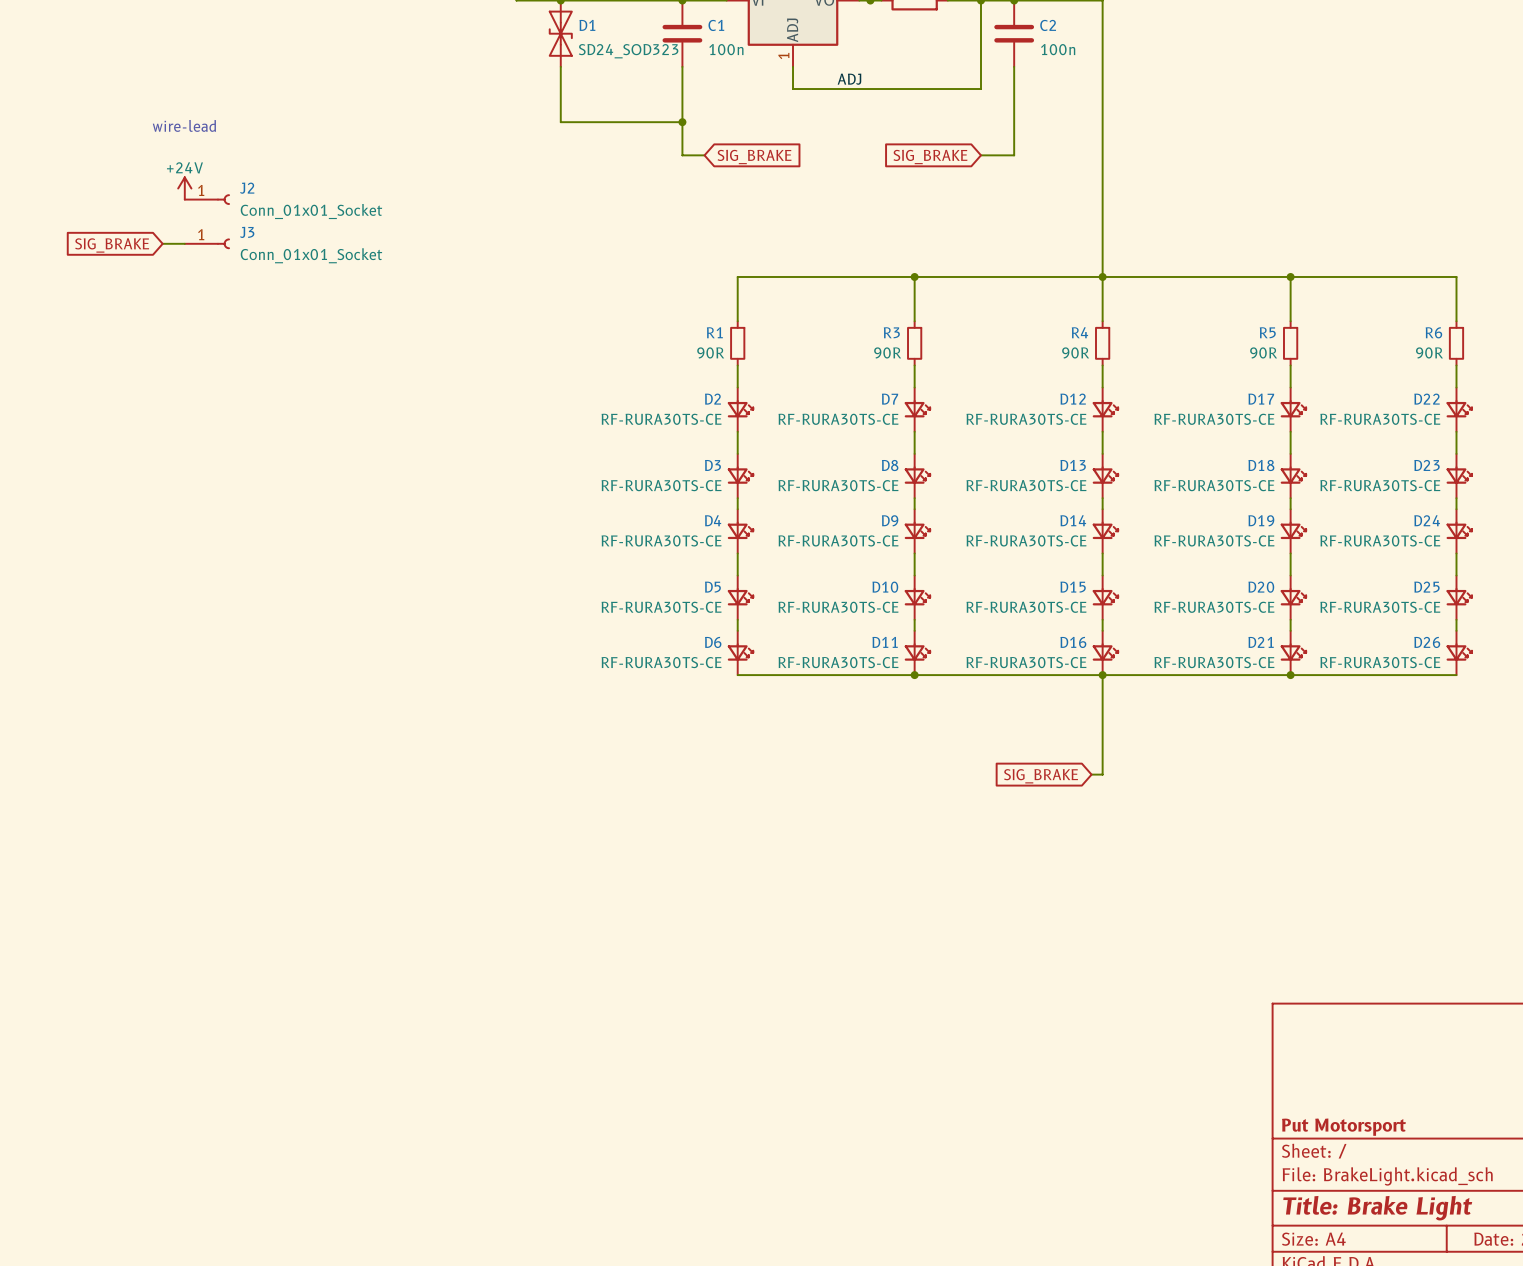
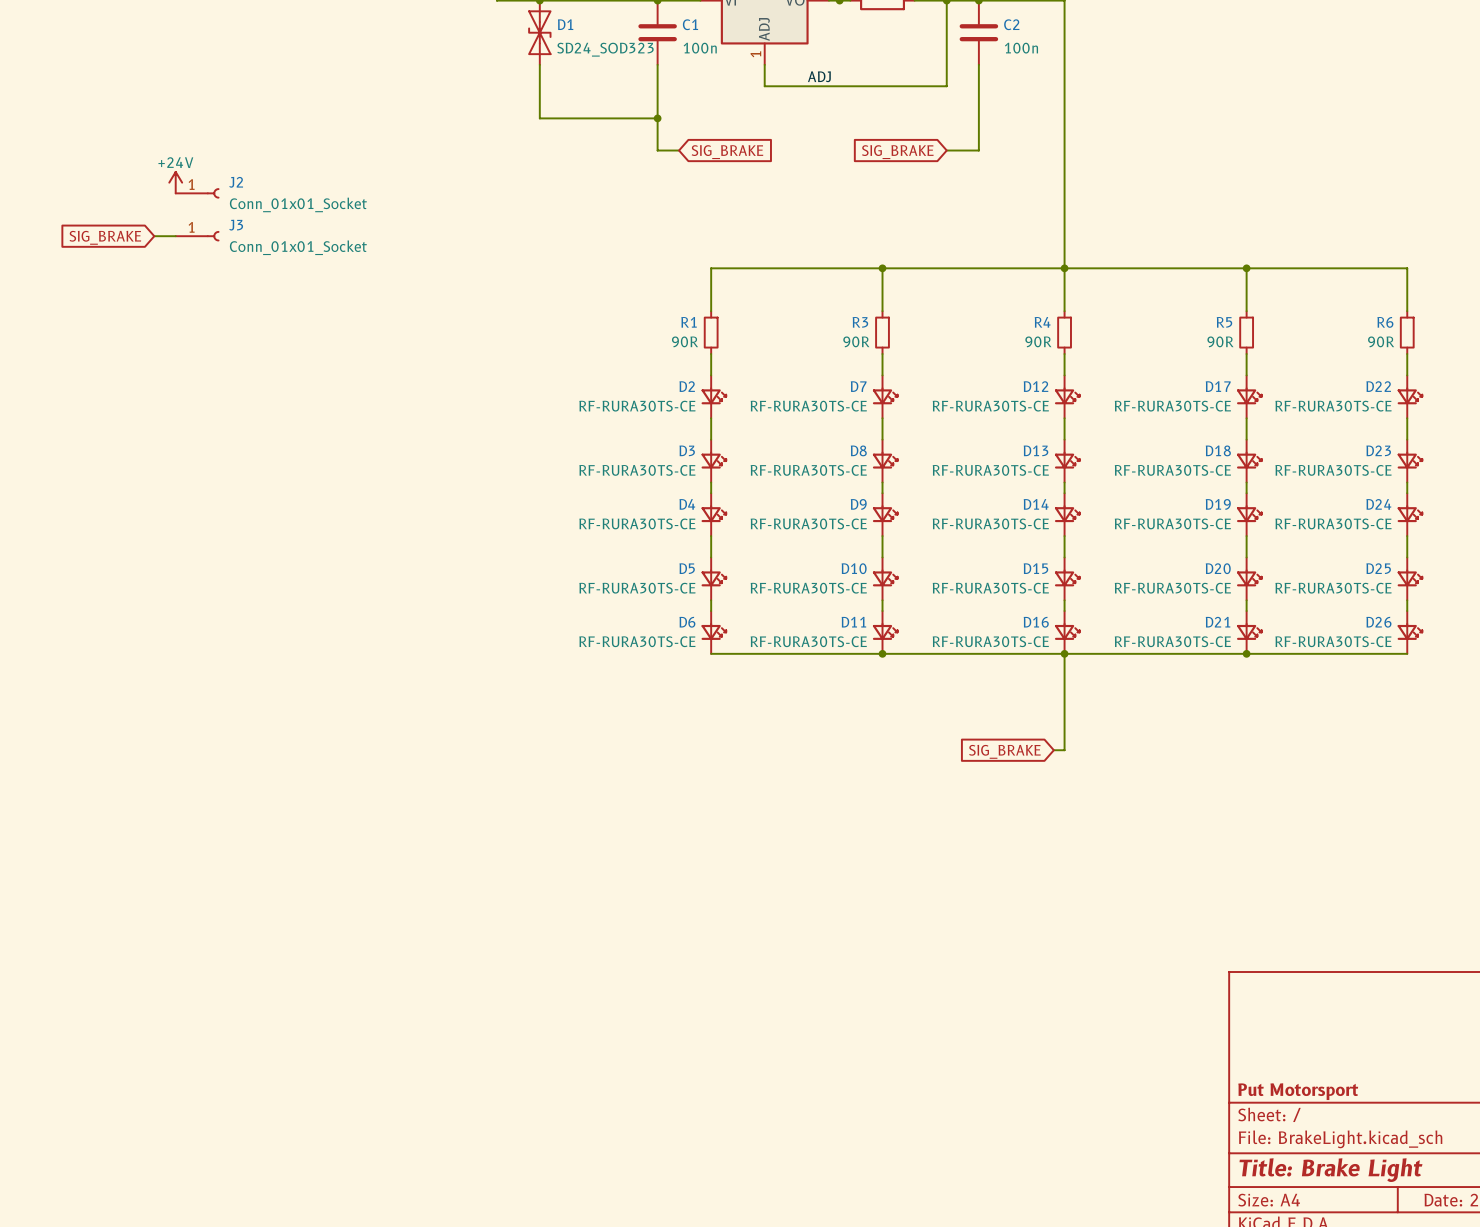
text: wire-lead (184, 125) -> none

